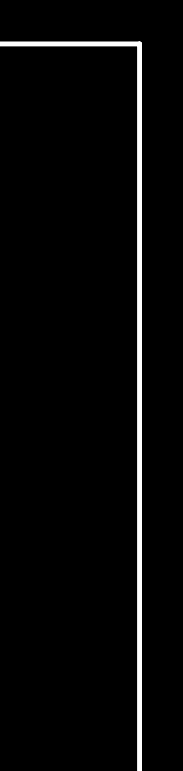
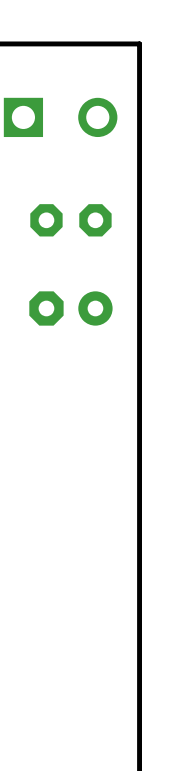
part: none -> (60, 117)
part: none -> (70, 220)
part: none -> (70, 308)

